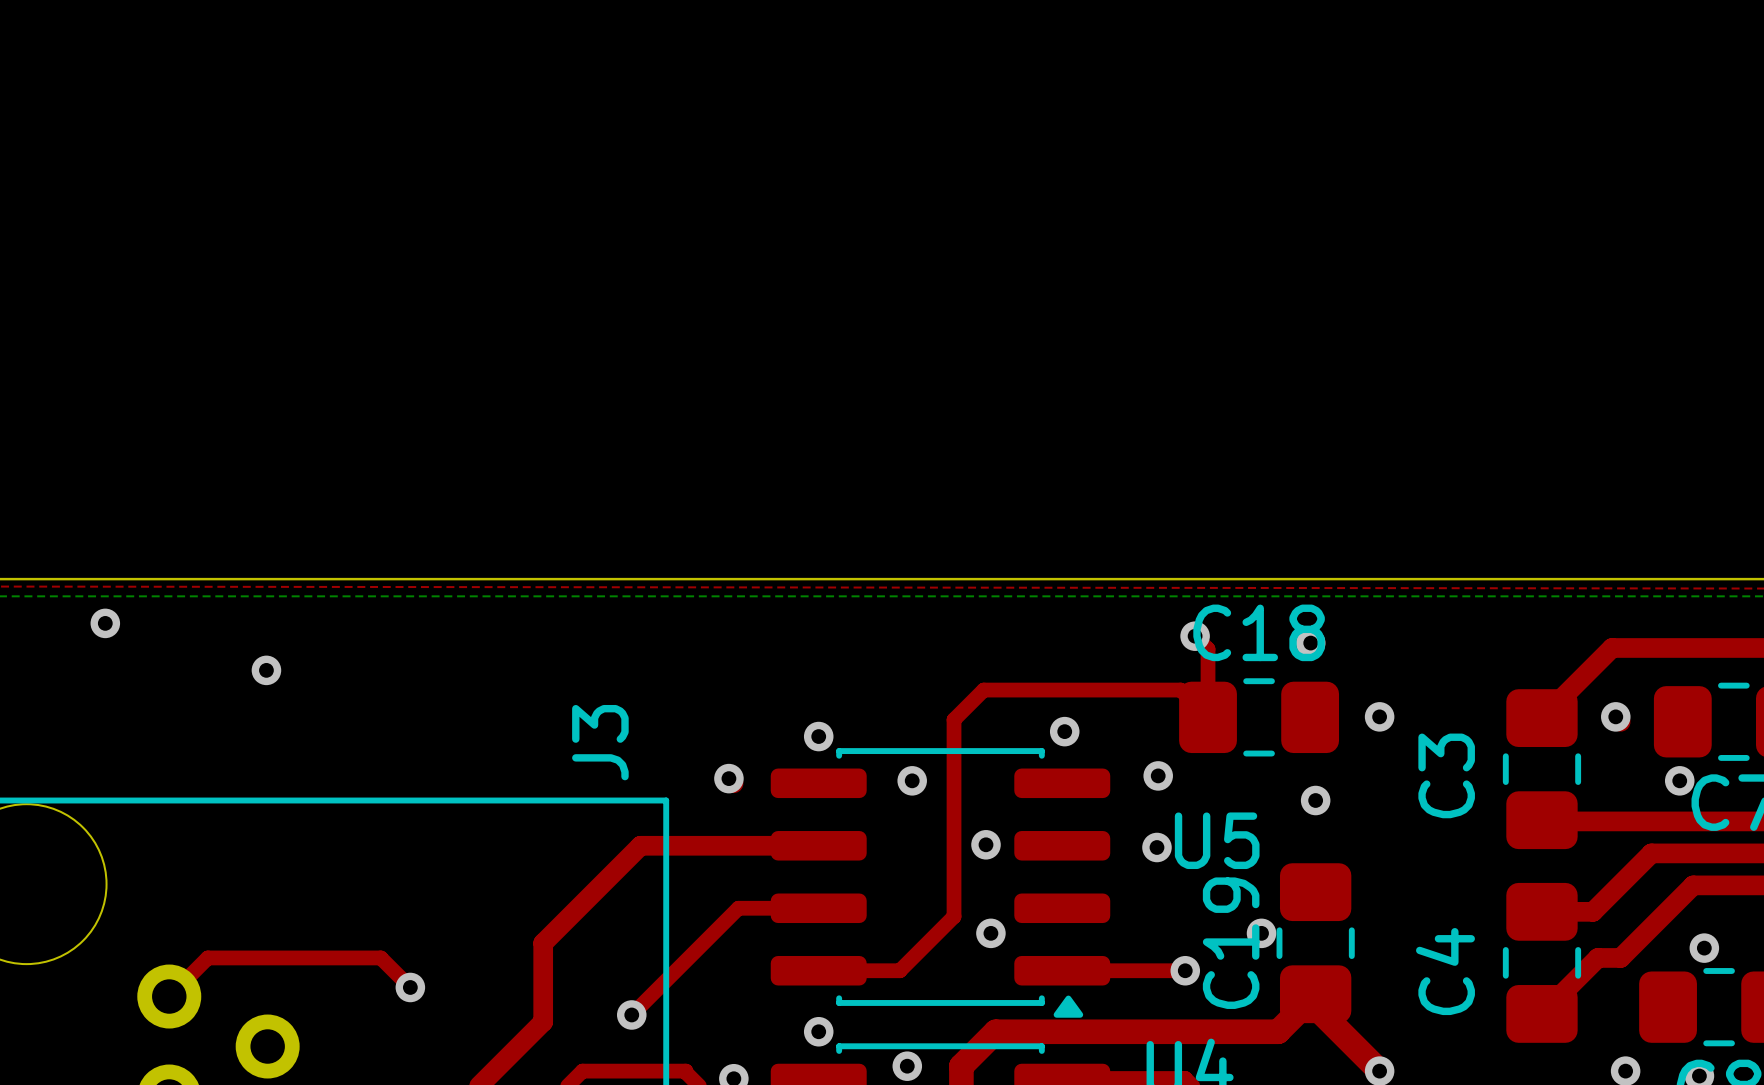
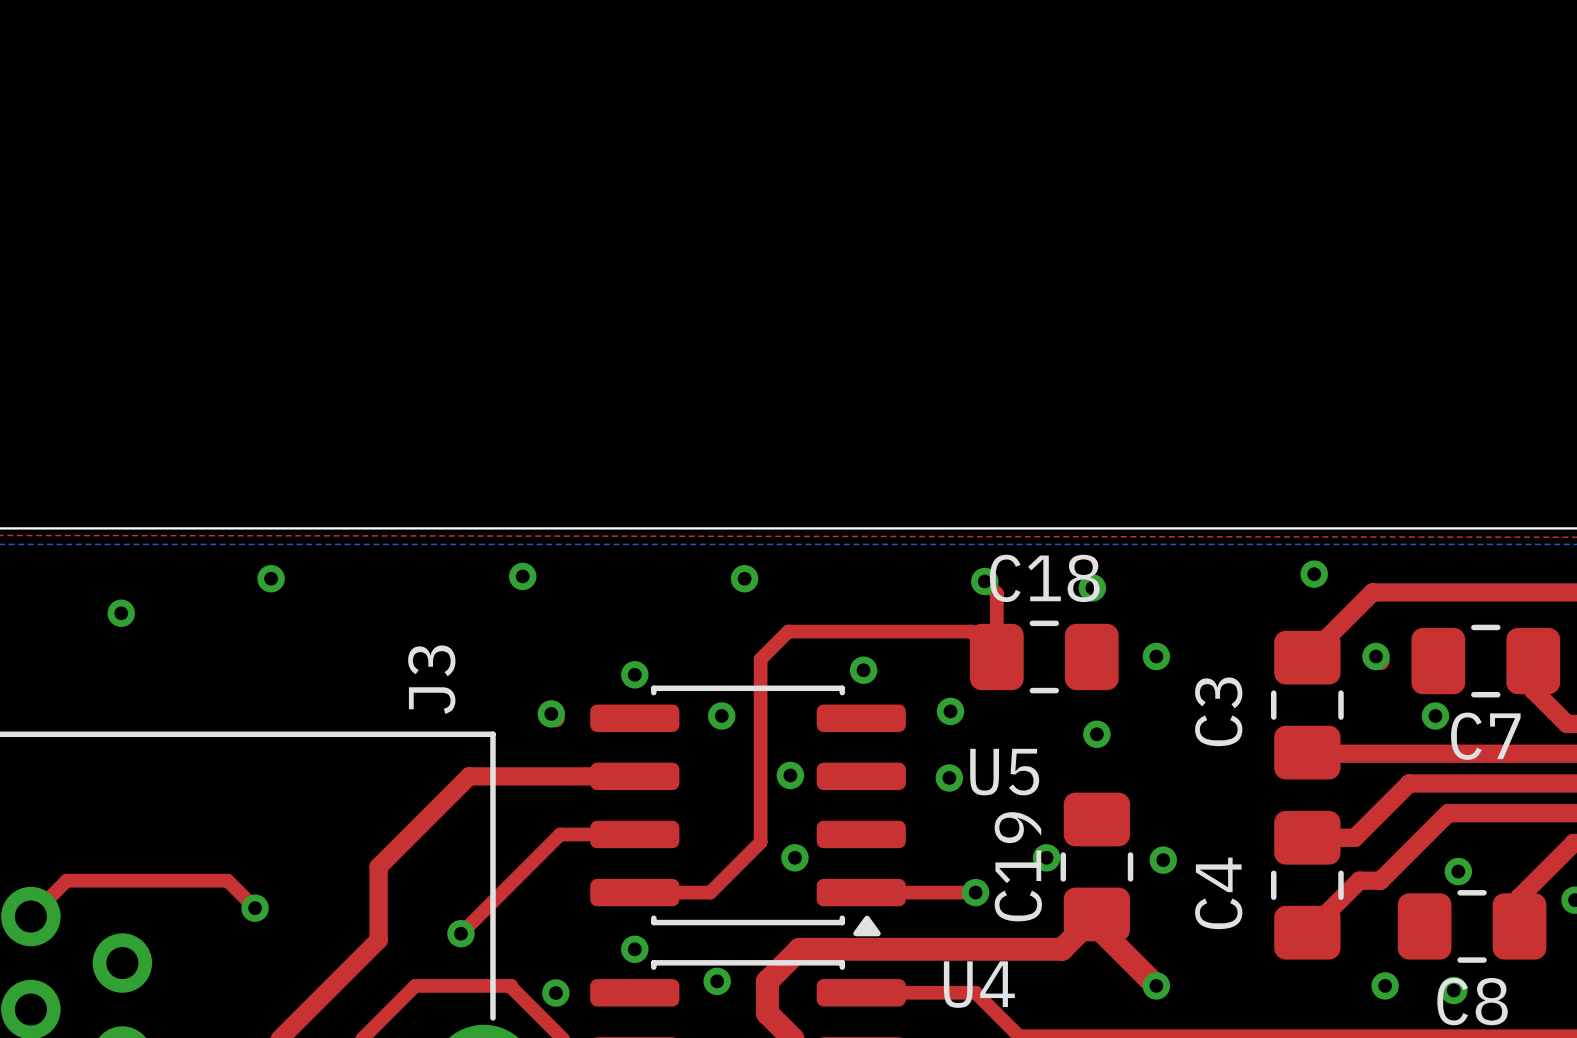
via: none -> (1314, 574)
via: none -> (522, 576)
via: none -> (271, 578)
via: none -> (744, 578)
via: none -> (1163, 860)

